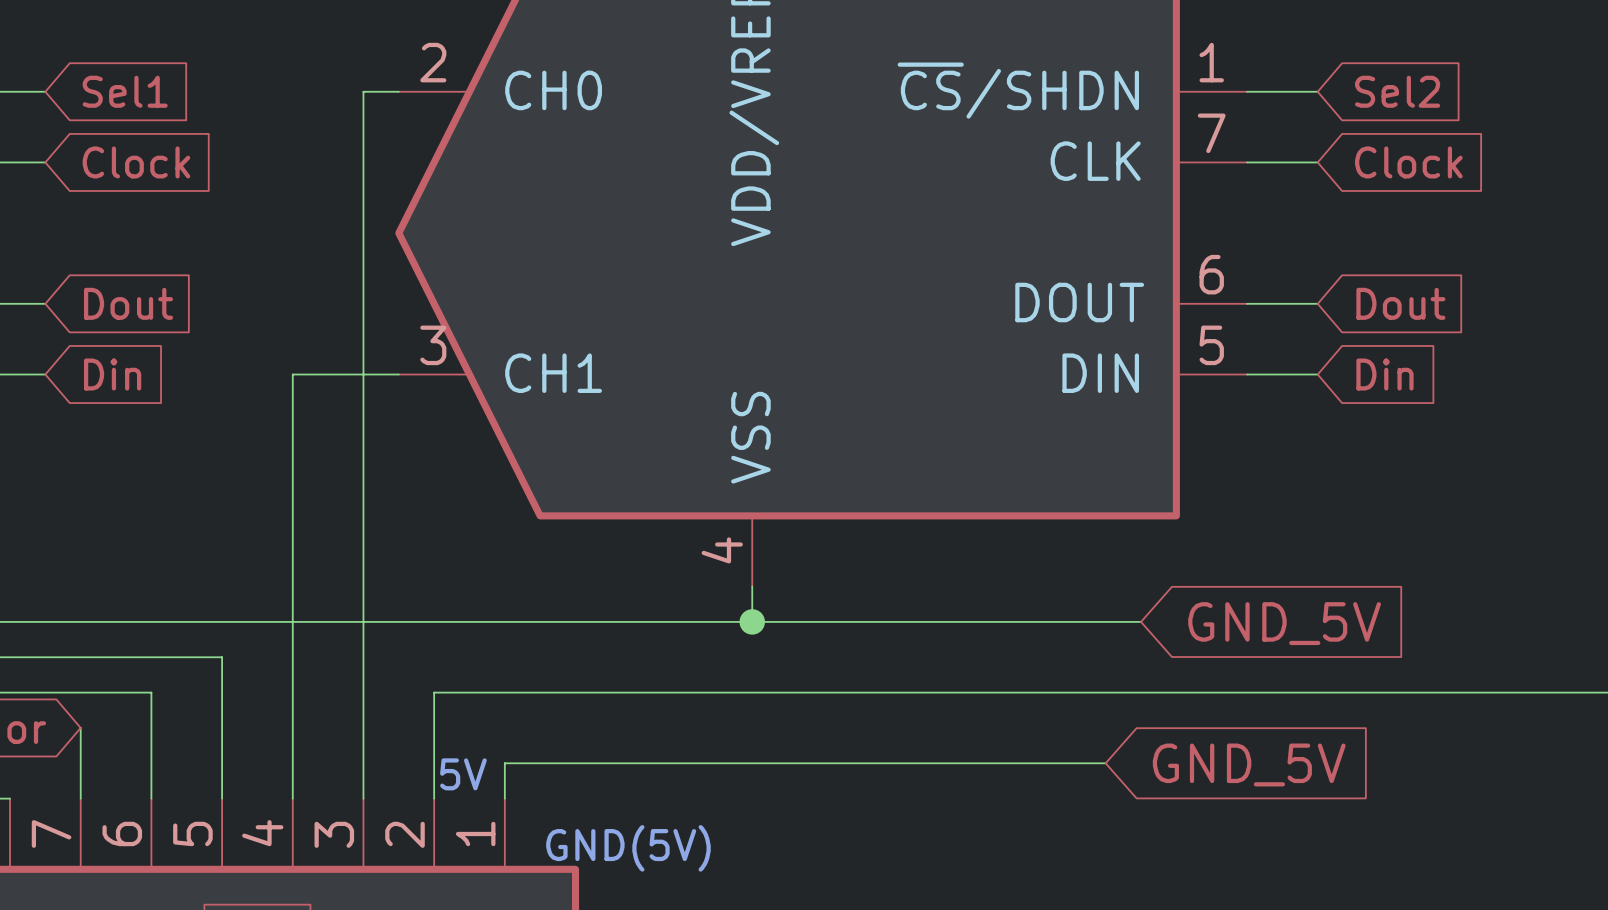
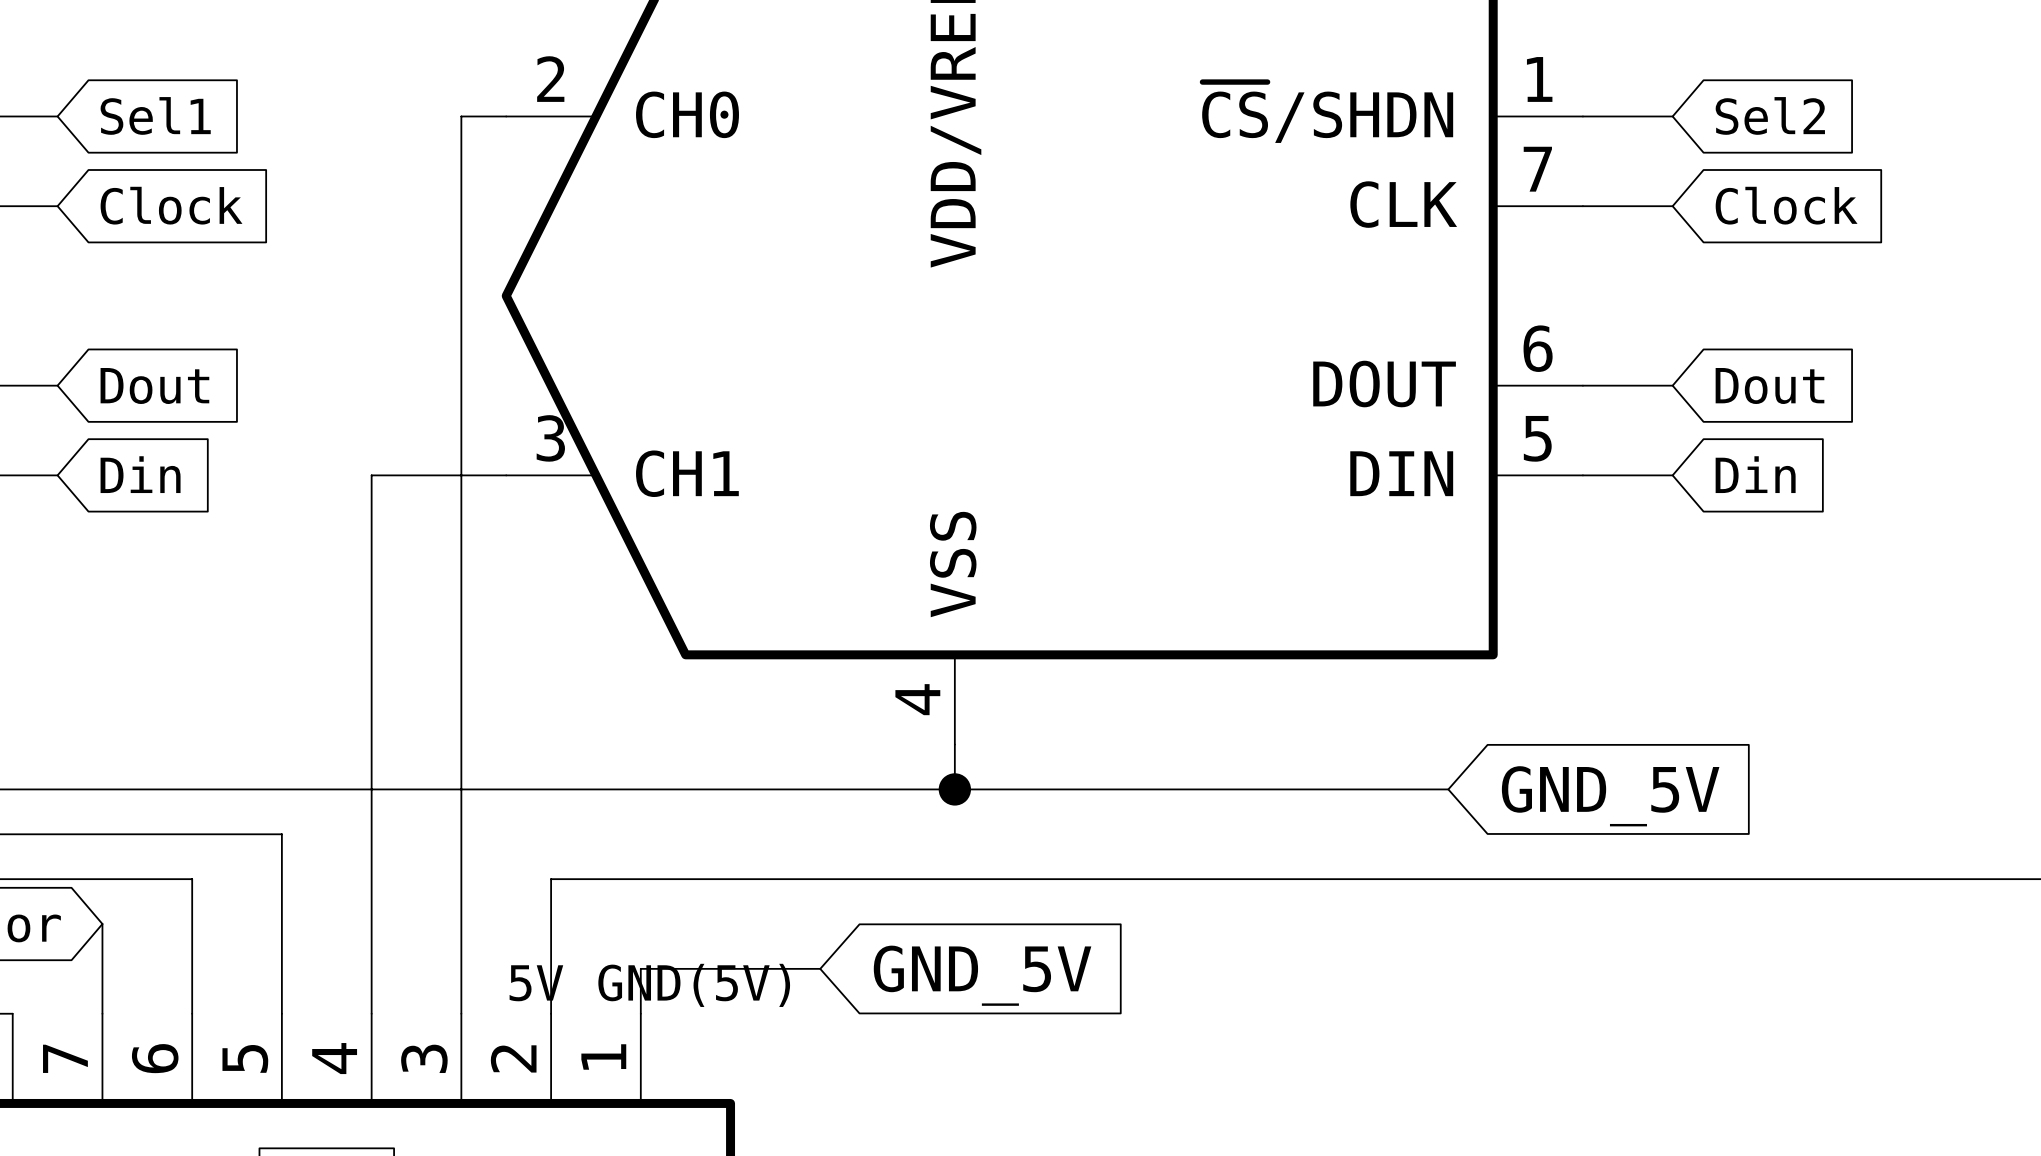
wire: (646, 763) (1105, 763) -> none
global label position: GND_5V (1249, 764) -> GND_5V (982, 975)
text position: 5V (463, 774) -> 5V (536, 983)
text position: GND(5V) (628, 848) -> GND(5V) (694, 985)

